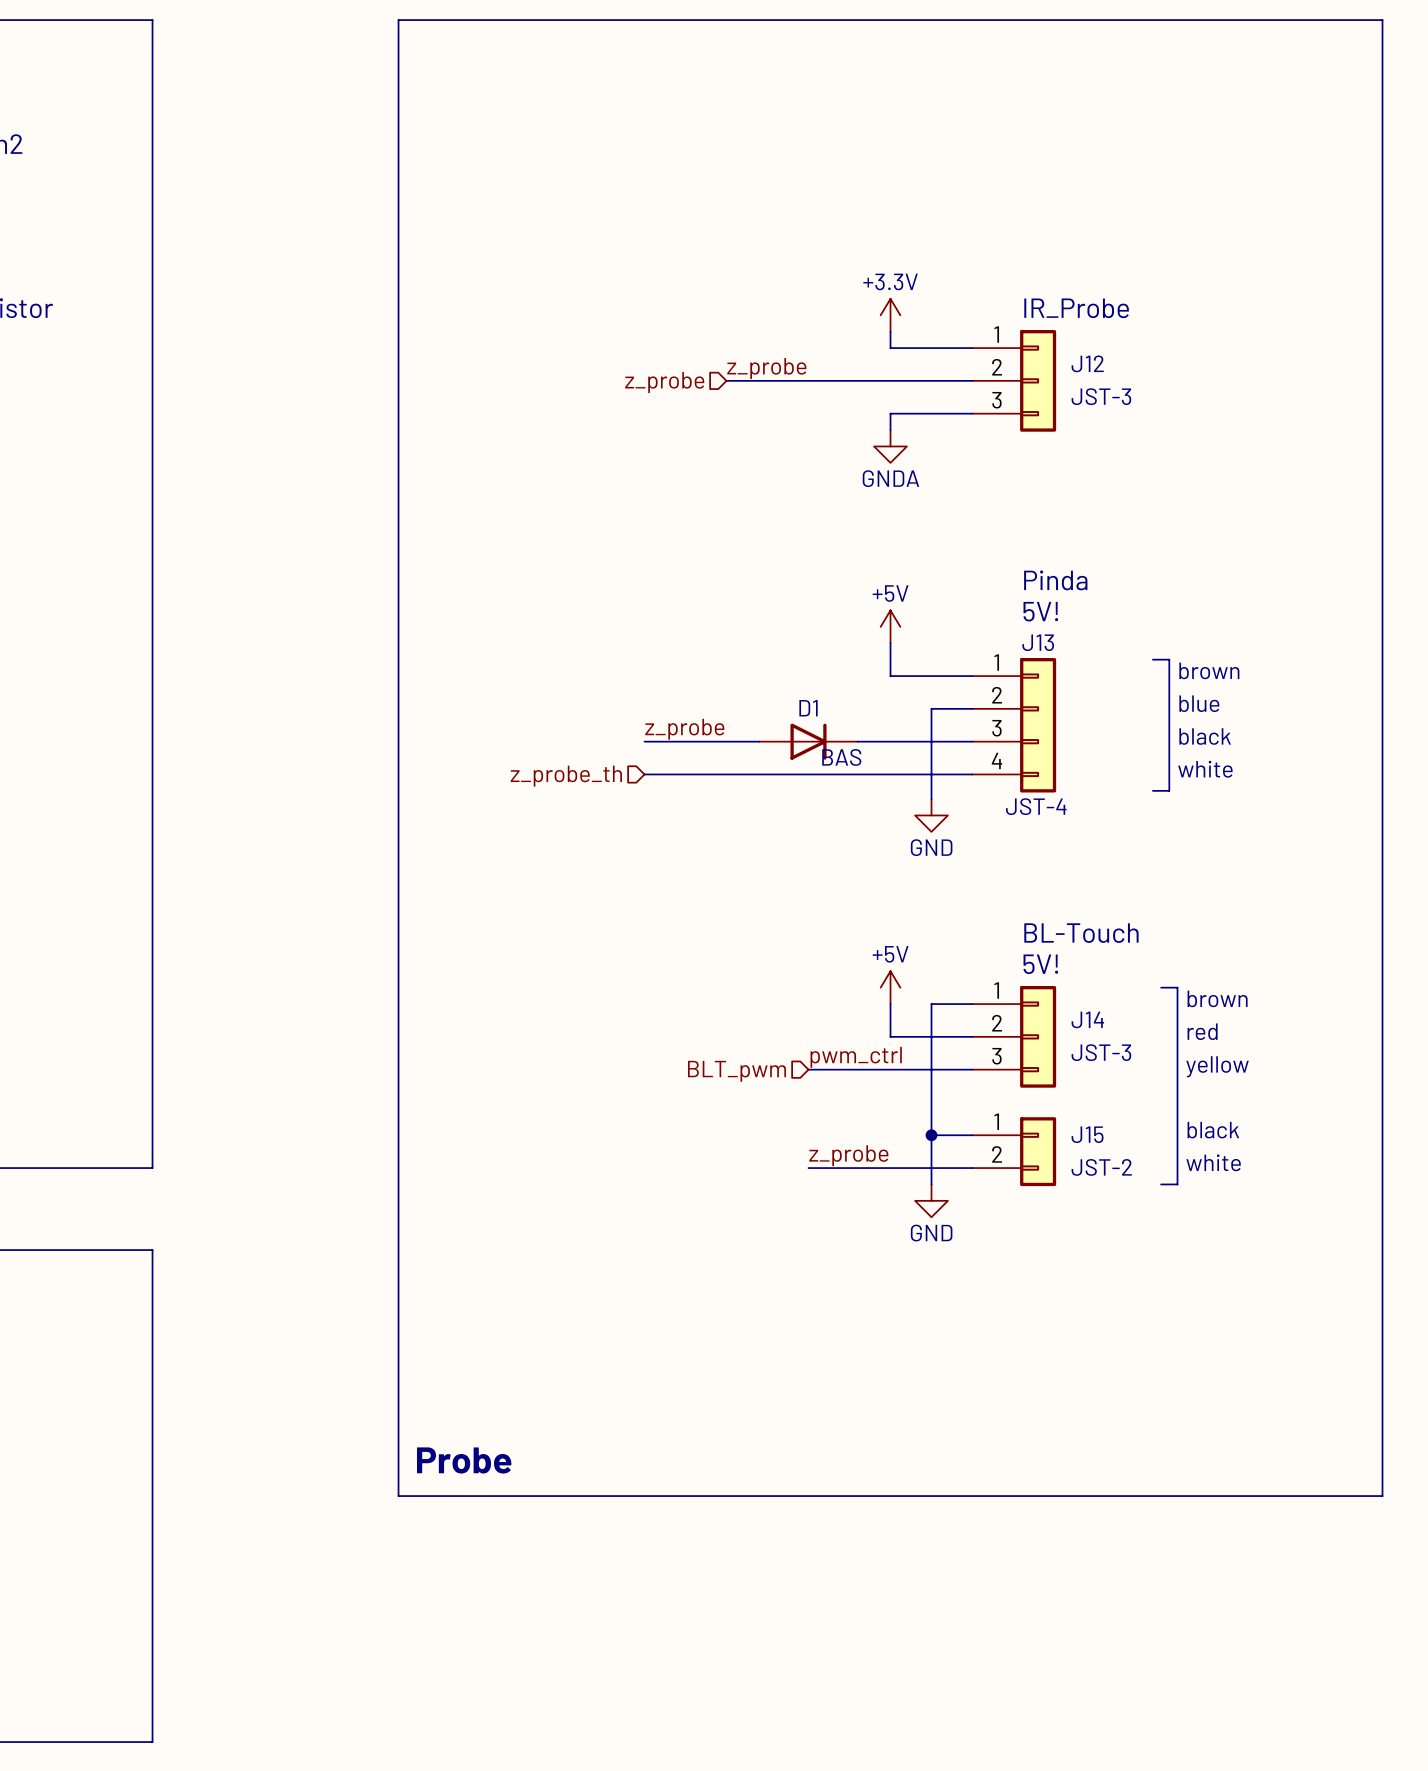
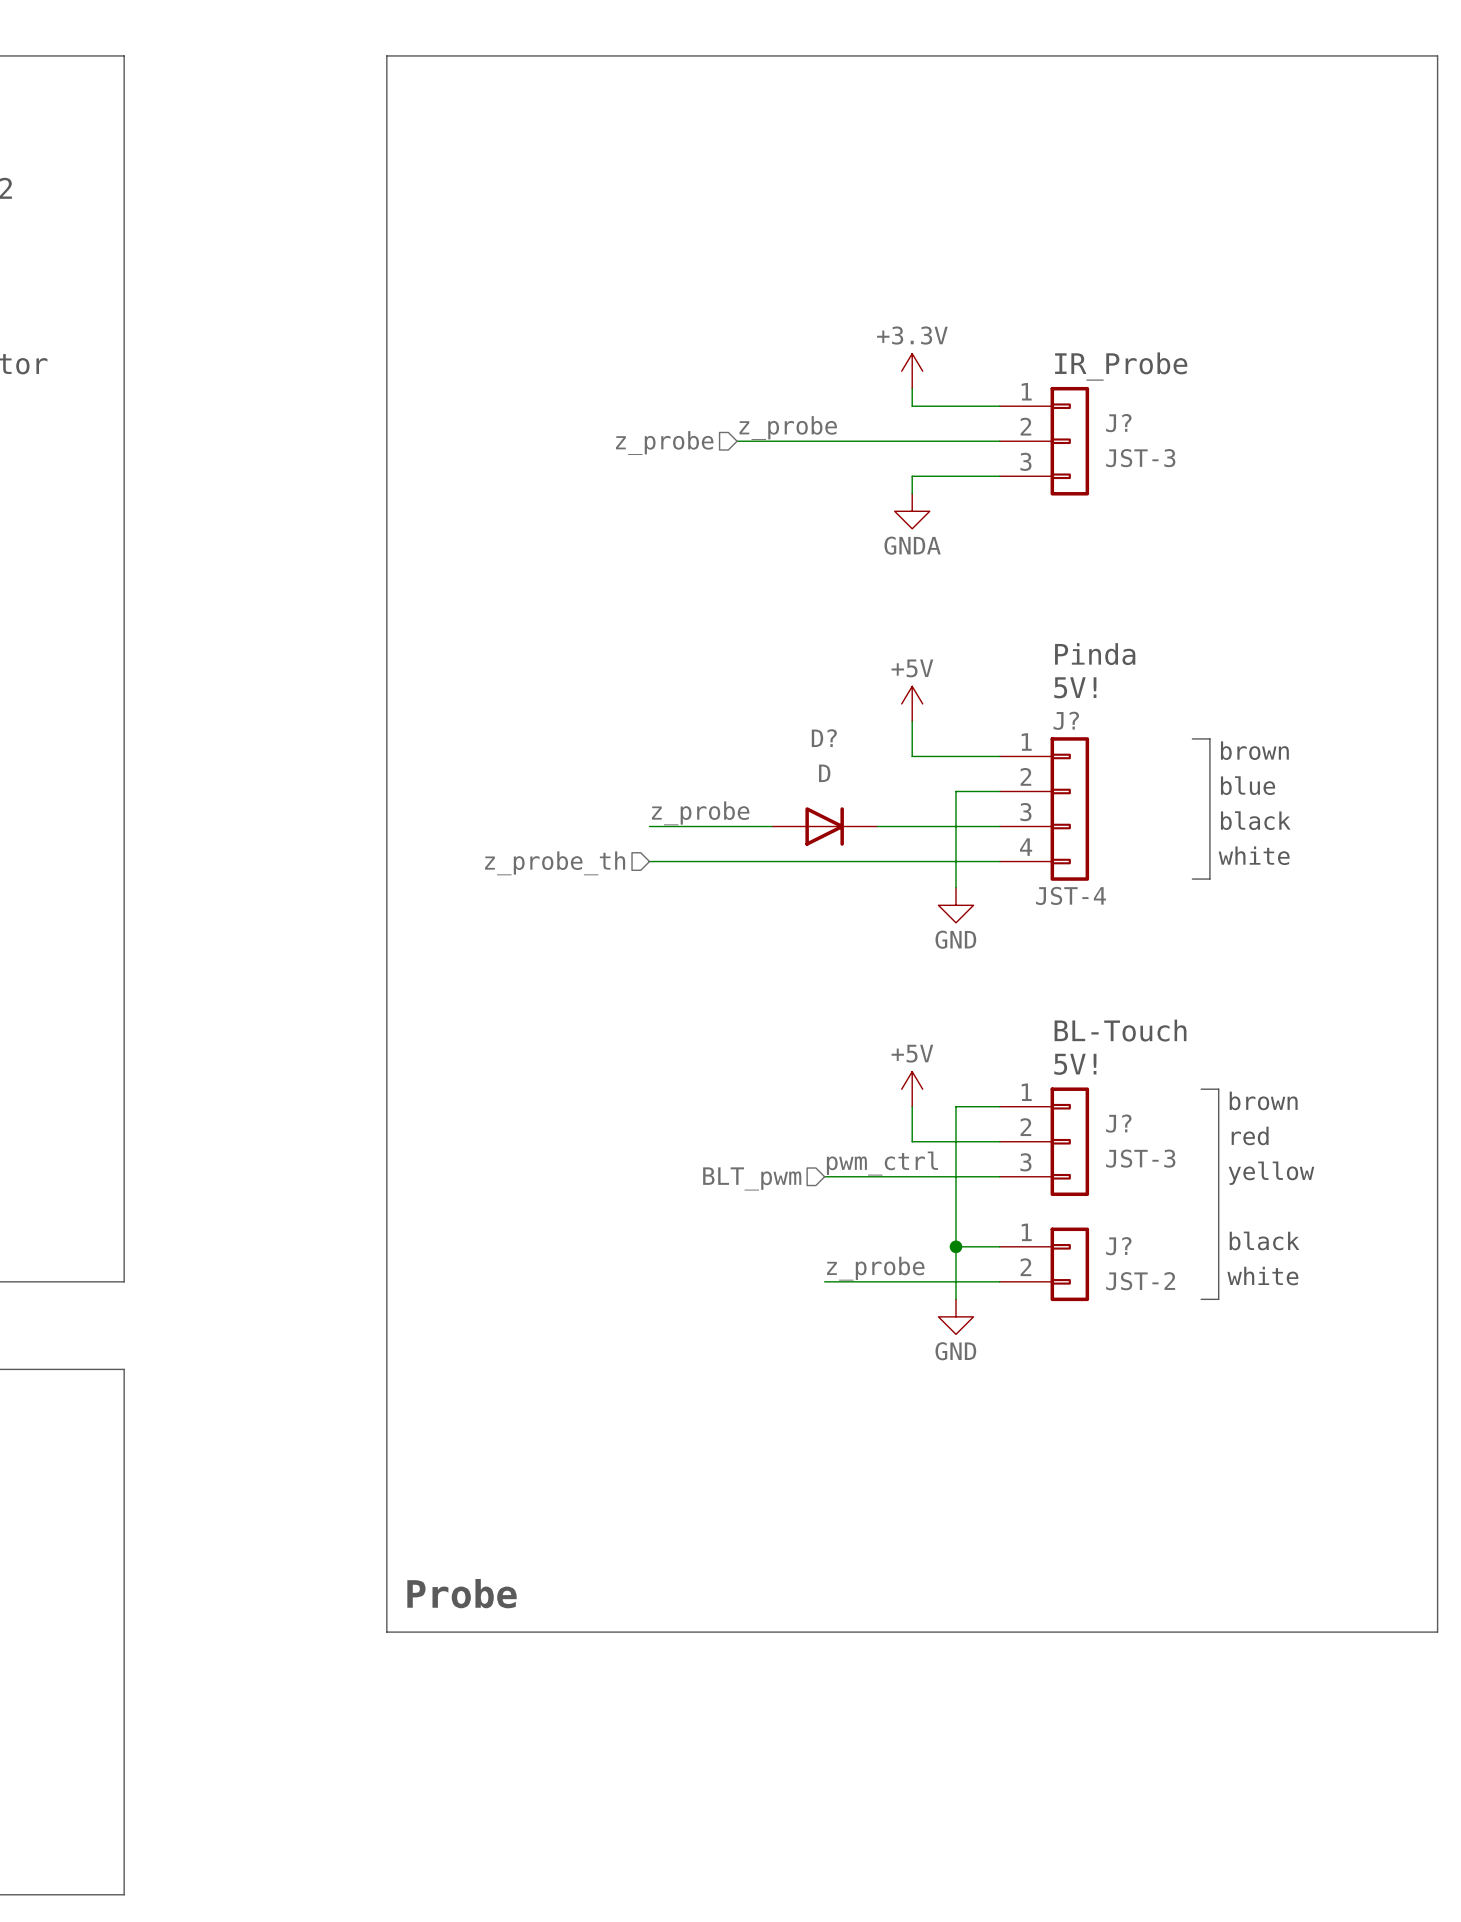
J12 name: J12 (1087, 363) -> J? (1118, 423)
J13 name: J13 (1038, 642) -> J? (1066, 720)
D1 name: D1 (808, 708) -> D? (824, 738)
D1 value: BAS (841, 757) -> D (824, 773)
J14 name: J14 (1087, 1019) -> J? (1118, 1123)
J15 name: J15 (1087, 1134) -> J? (1118, 1246)

